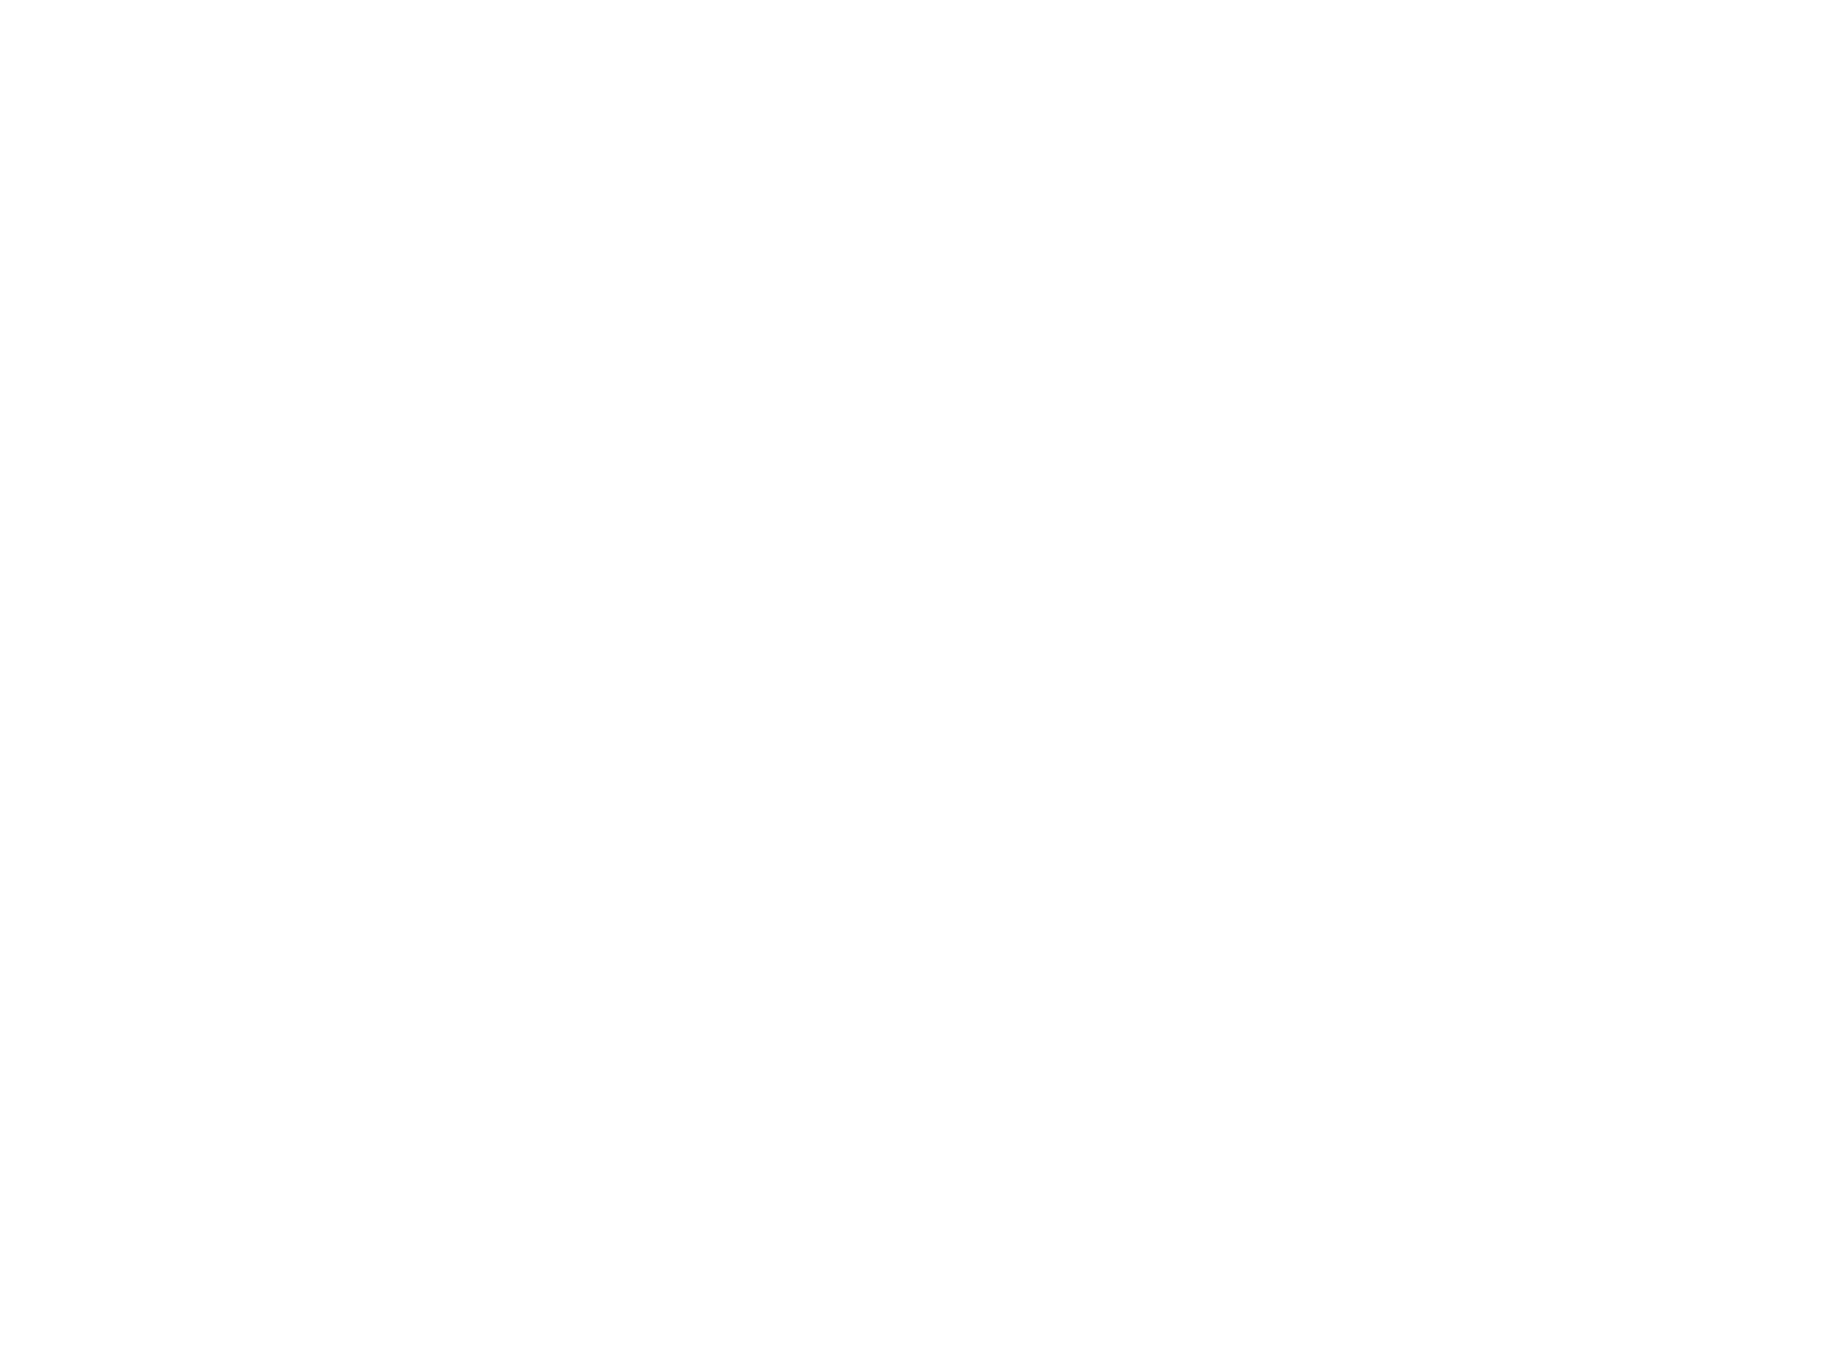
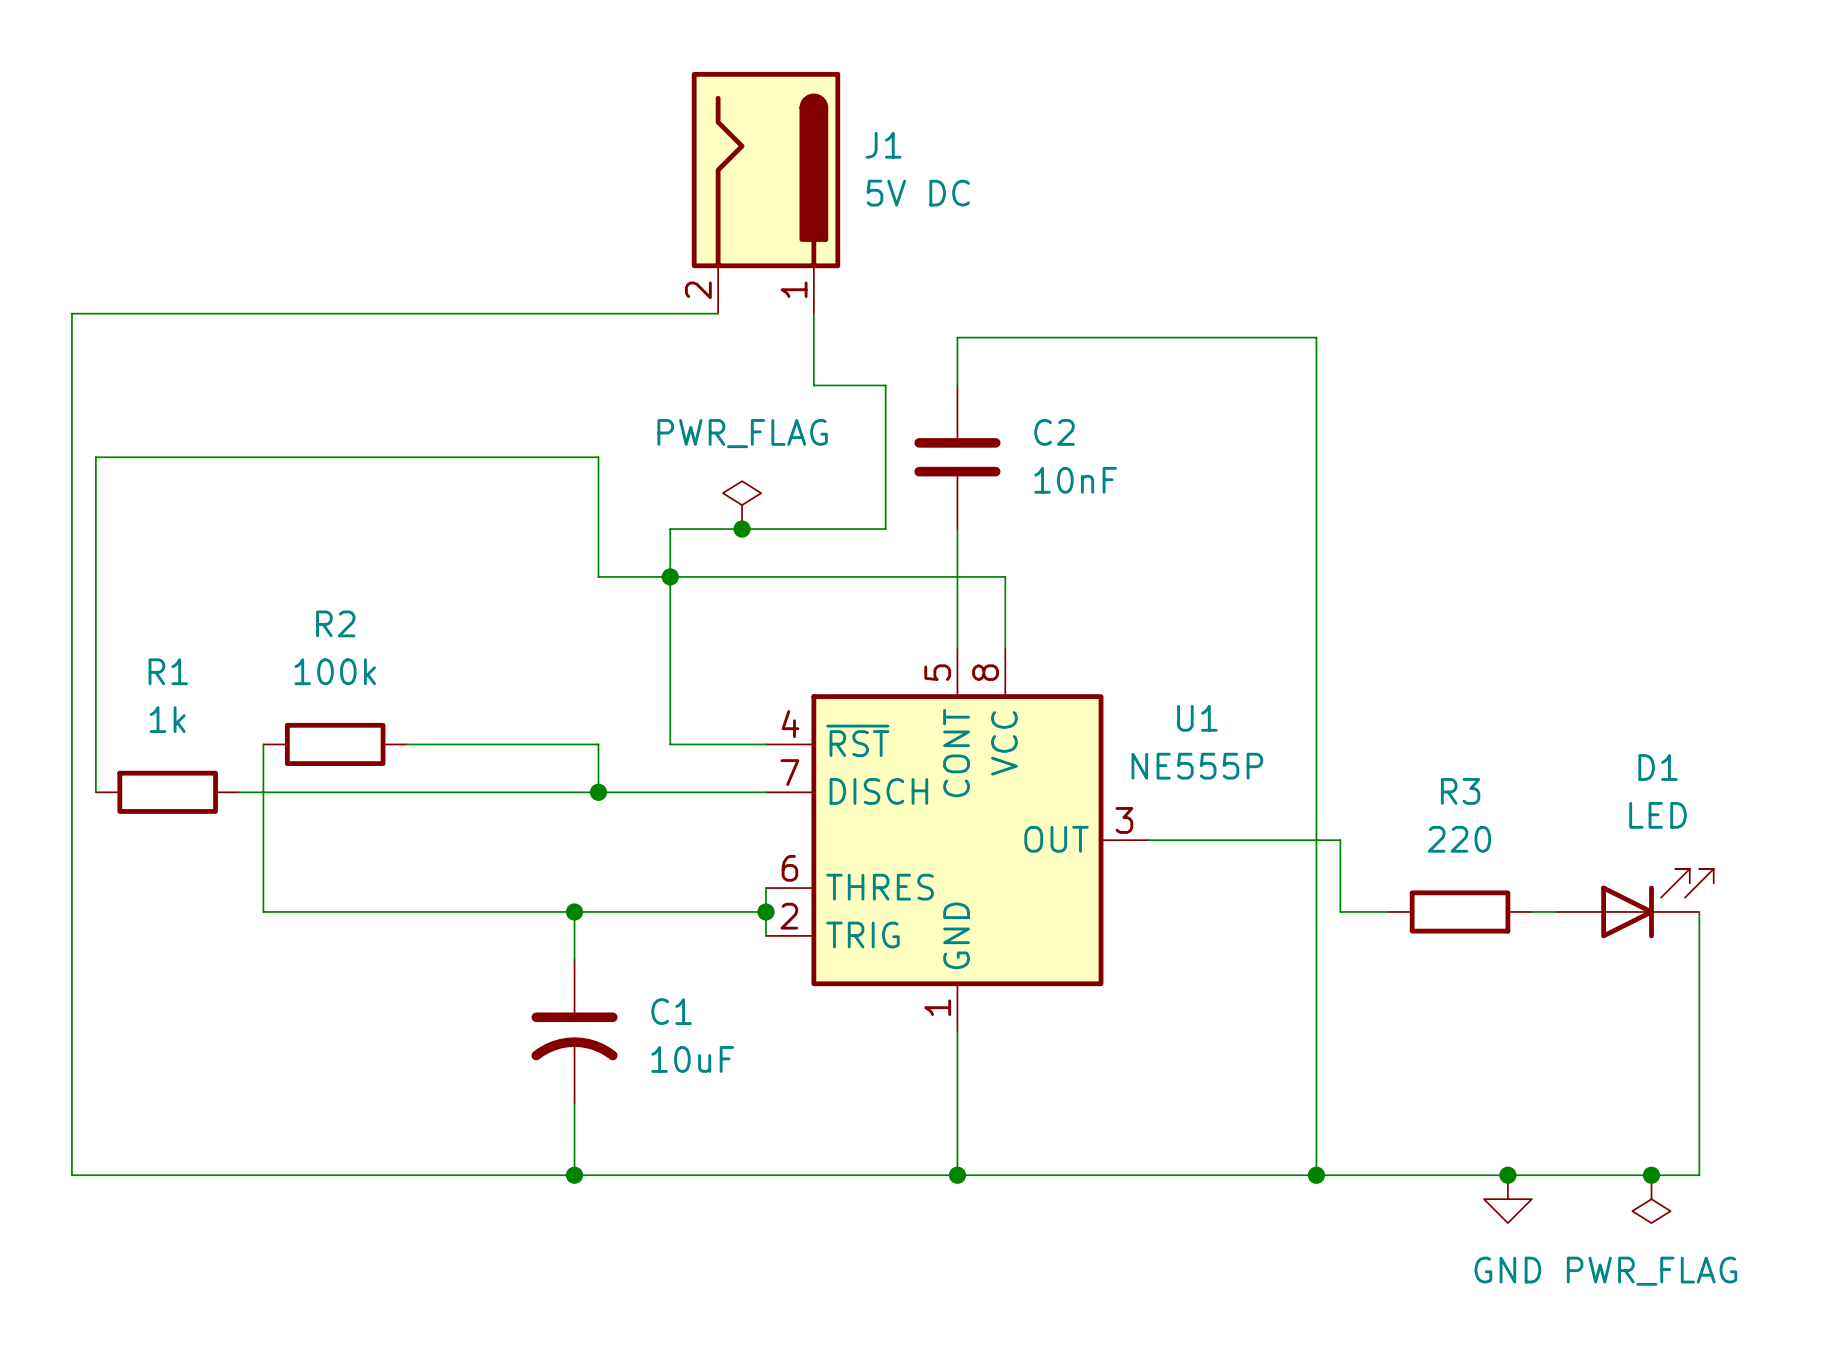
J1: none -> 5V DC (765, 192)
wire: none -> (718, 313) (71, 313) (71, 1175) (1699, 1175) (1699, 911)
wire: none -> (813, 313) (813, 385) (885, 385) (885, 529) (670, 529) (670, 744) (765, 744)
wire: none -> (957, 385) (957, 337) (1316, 337) (1316, 1175)
C2: none -> 10nF (957, 457)
power symbol: none -> PWR_FLAG (742, 505)
junction: none -> (742, 529)
wire: none -> (957, 529) (957, 648)
junction: none -> (670, 576)
wire: none -> (1005, 648) (1005, 576) (598, 576) (598, 457) (95, 457) (95, 792)
wire: none -> (263, 744) (263, 911) (765, 911)
R2: none -> 100k (335, 744)
wire: none -> (407, 744) (598, 744) (598, 792)
R1: none -> 1k (167, 792)
wire: none -> (239, 792) (765, 792)
junction: none -> (598, 792)
U1: none -> NE555P (957, 840)
wire: none -> (1148, 840) (1340, 840) (1340, 911) (1388, 911)
wire: none -> (765, 888) (765, 935)
D1: none -> LED (1634, 903)
wire: none -> (574, 911) (574, 959)
junction: none -> (574, 911)
junction: none -> (765, 911)
R3: none -> 220 (1460, 911)
wire: none -> (1531, 911) (1555, 911)
C1: none -> 10uF (574, 1031)
wire: none -> (957, 1031) (957, 1175)
wire: none -> (574, 1103) (574, 1175)
junction: none -> (574, 1175)
junction: none -> (957, 1175)
junction: none -> (1316, 1175)
junction: none -> (1507, 1175)
junction: none -> (1651, 1175)
power symbol: none -> GND (1507, 1199)
power symbol: none -> PWR_FLAG (1651, 1199)

